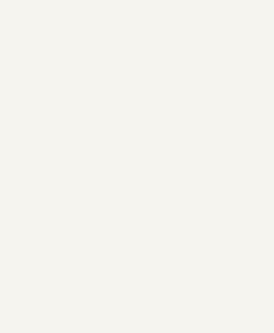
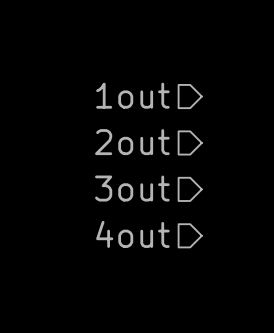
hierarchical label: none -> 1out (132, 95)
hierarchical label: none -> 2out (132, 142)
hierarchical label: none -> 3out (132, 188)
hierarchical label: none -> 4out (132, 234)

